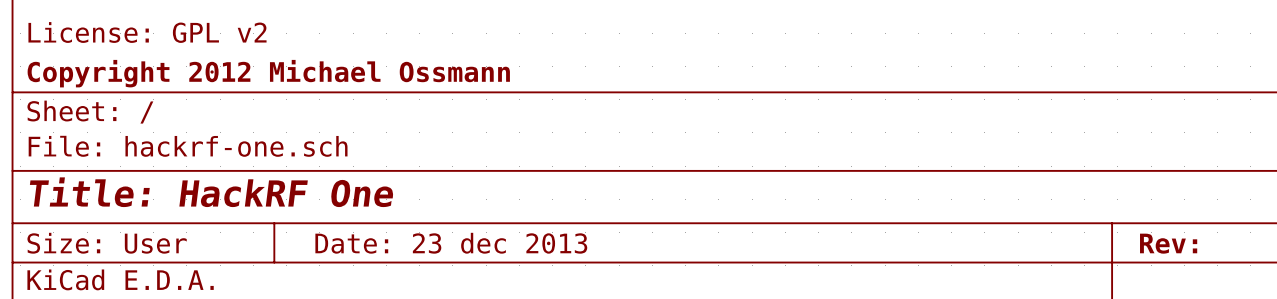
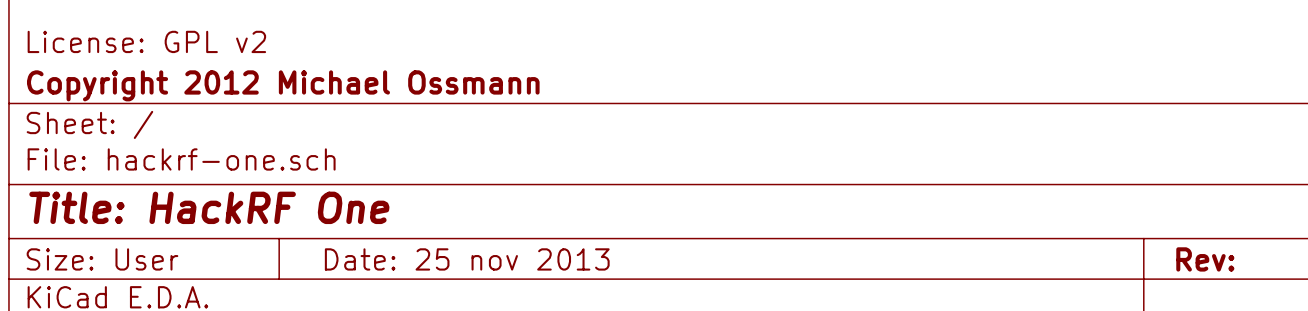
title block: Date: 23 dec 2013 (451, 243) -> Date: 25 nov 2013 (467, 259)

